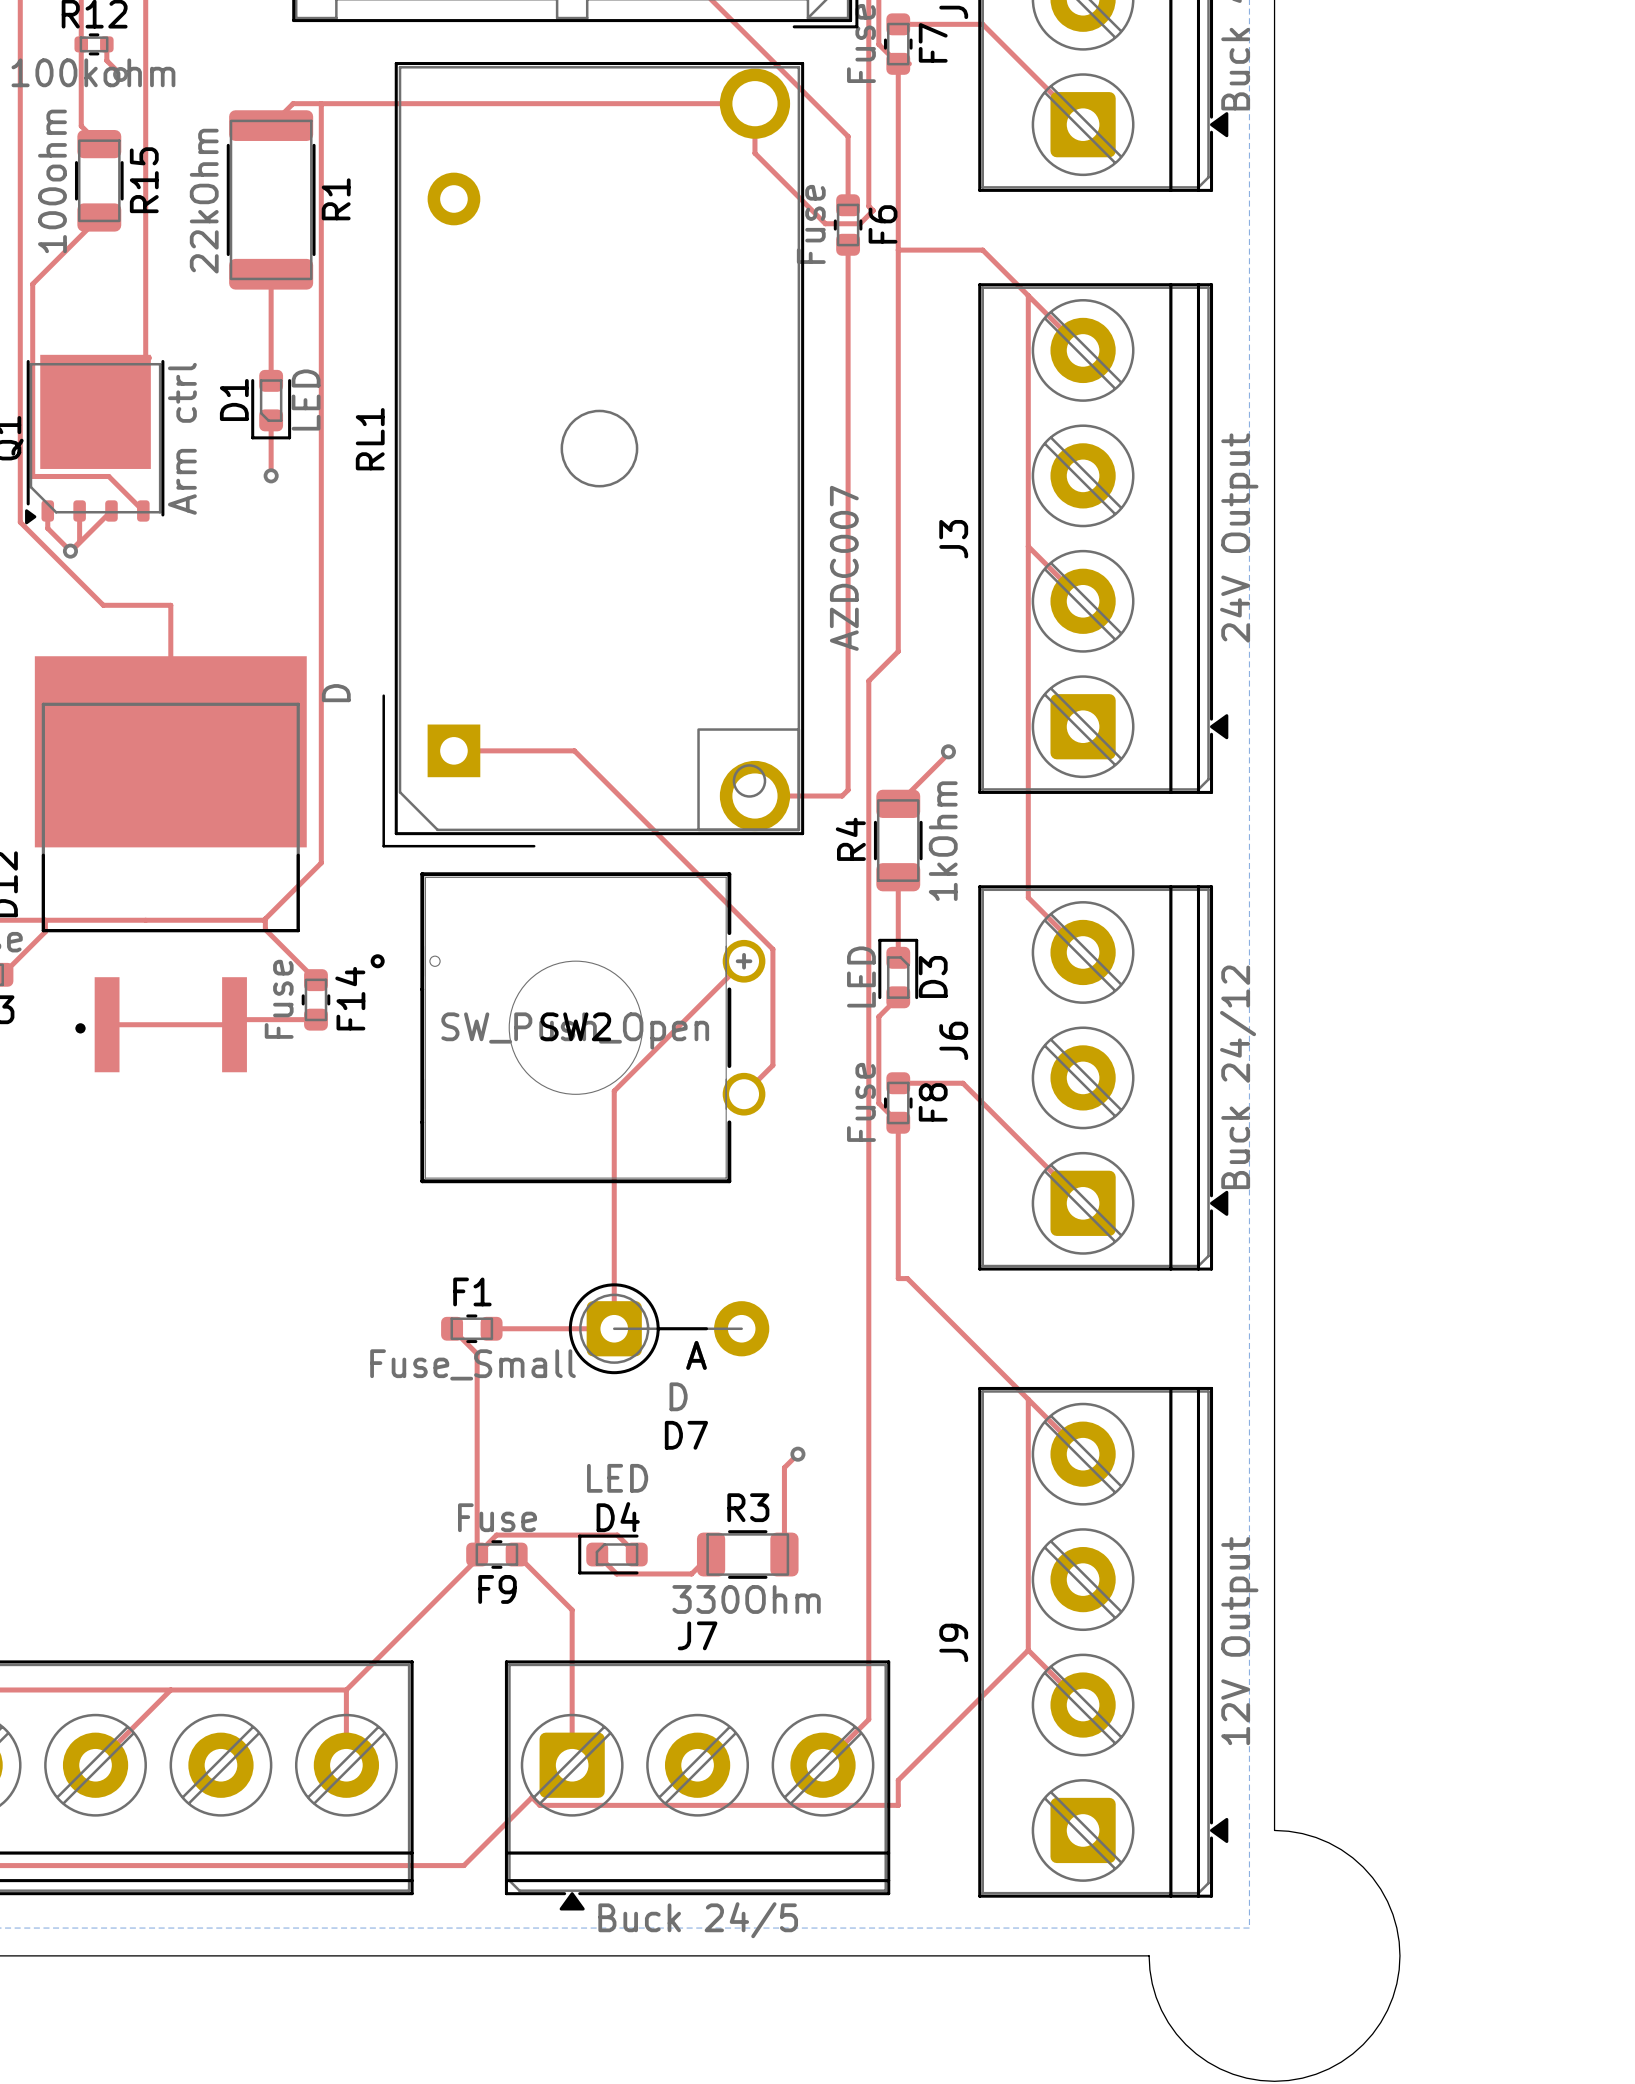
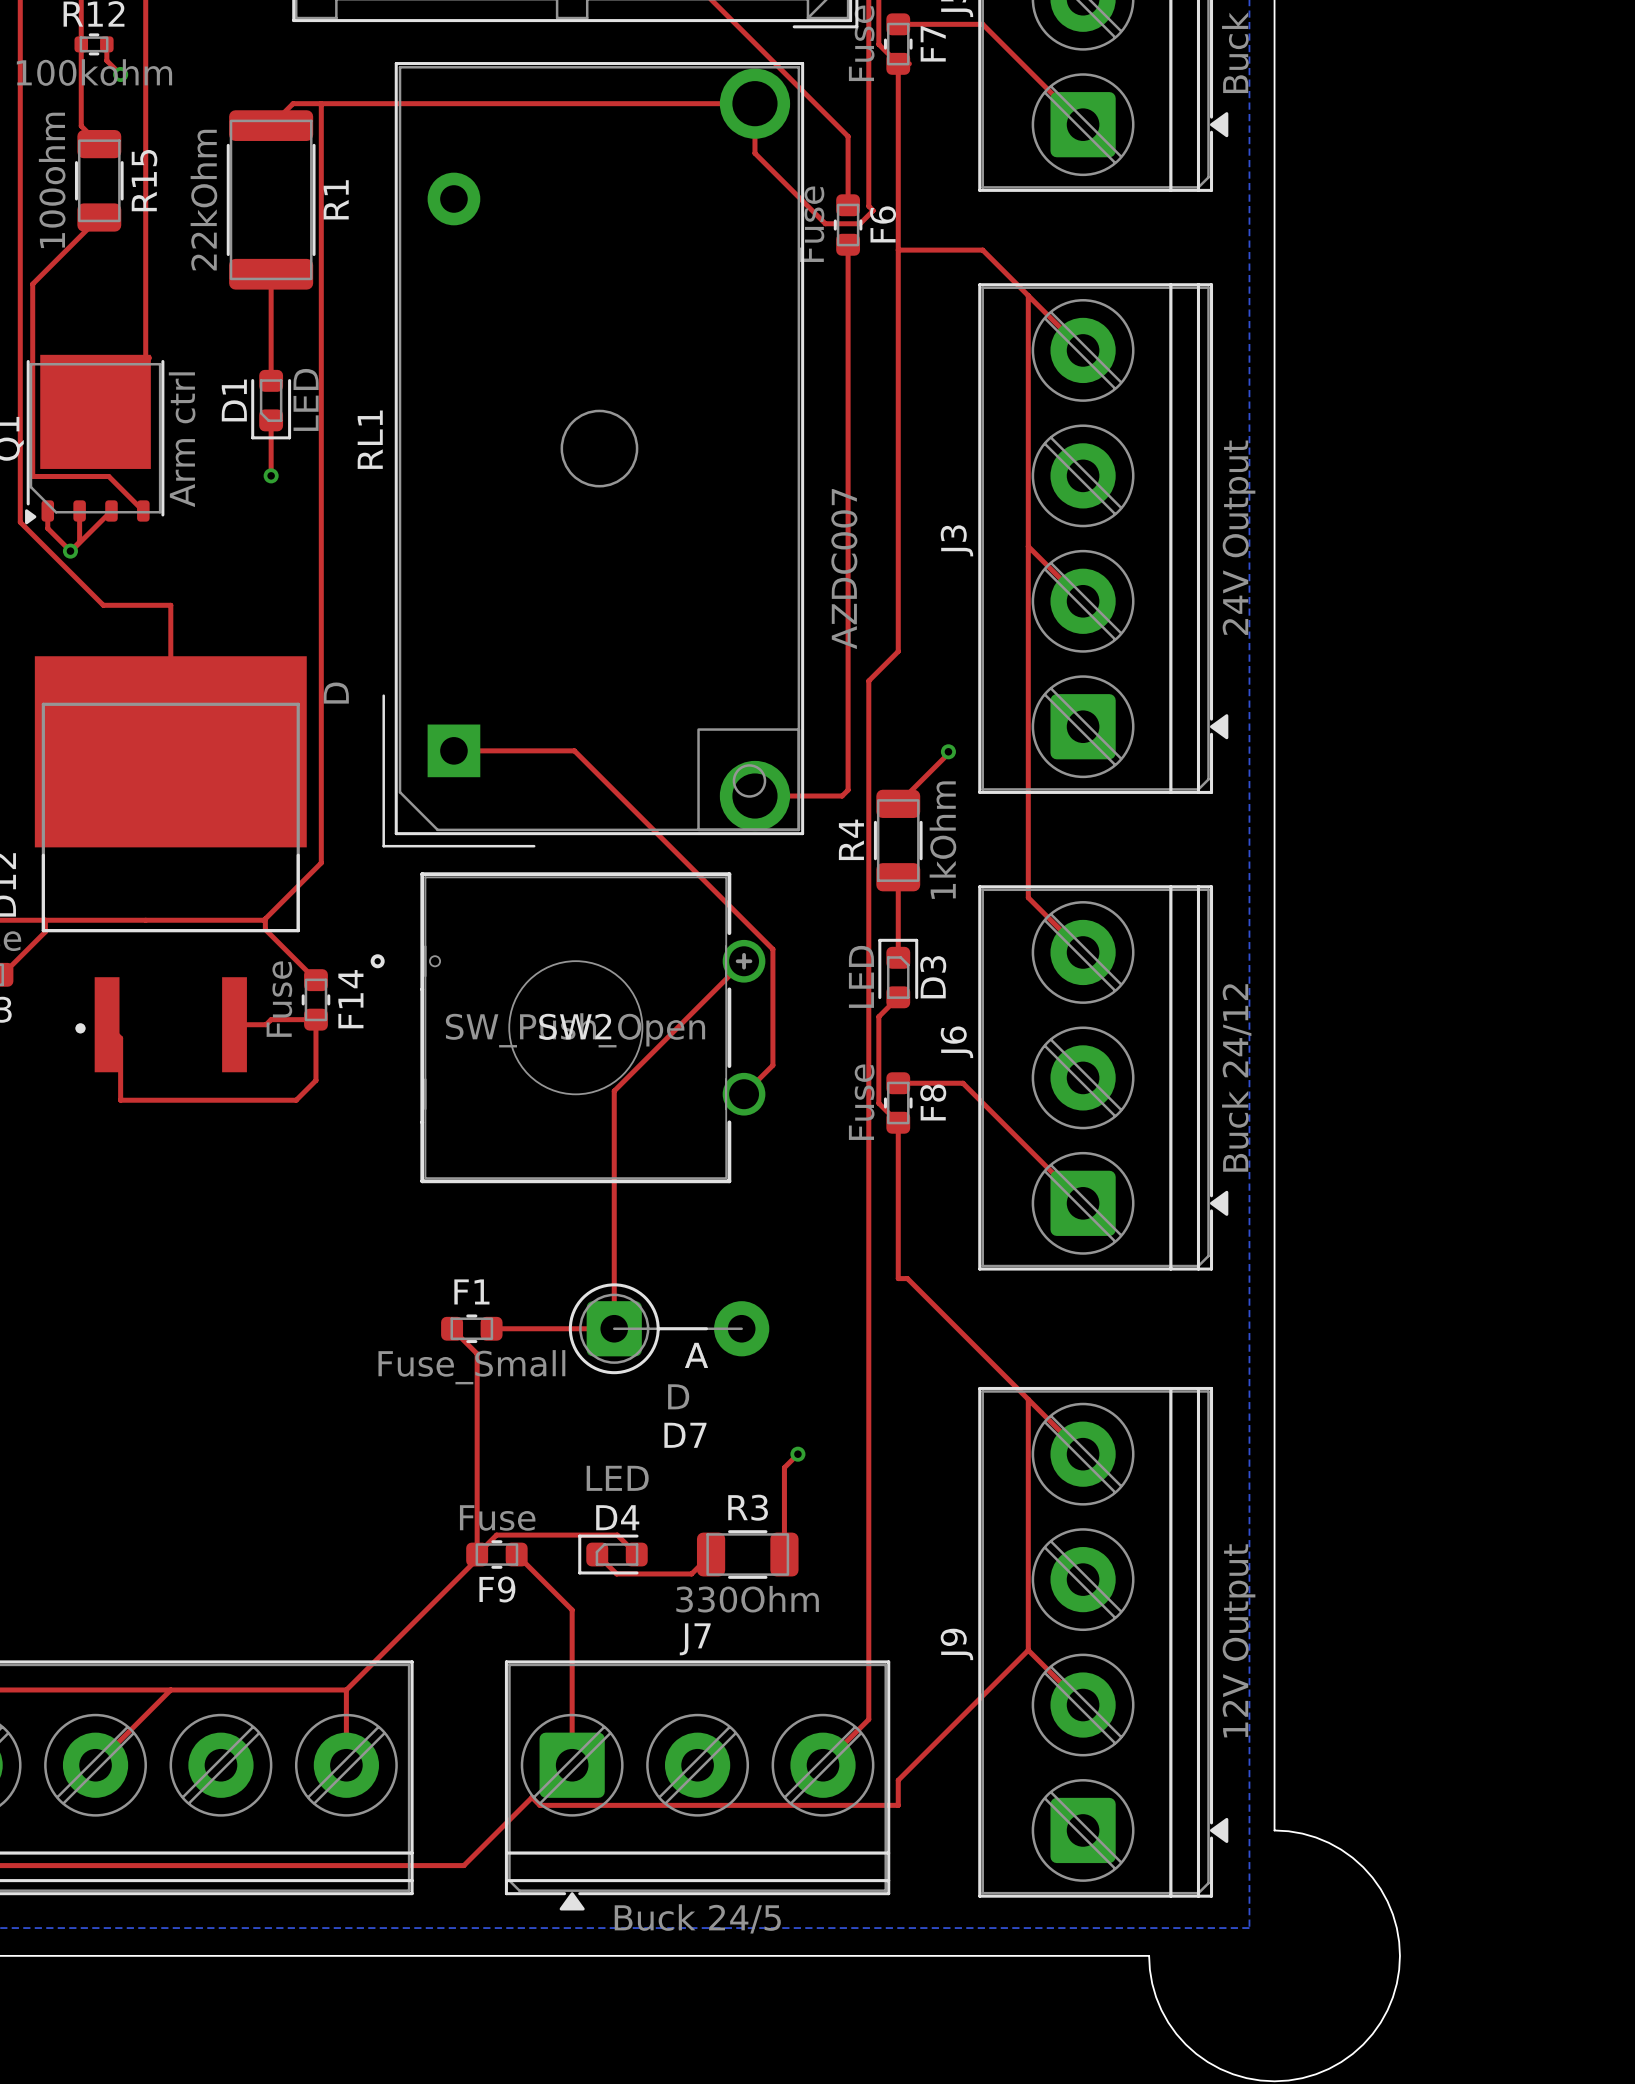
top track: (271, 1019) (239, 1019) (234, 1024) (107, 1024) -> (315, 1019) (315, 1080) (296, 1100) (120, 1100) (120, 1038) (107, 1024)
top track: none -> (271, 1019) (266, 1024) (234, 1024)

